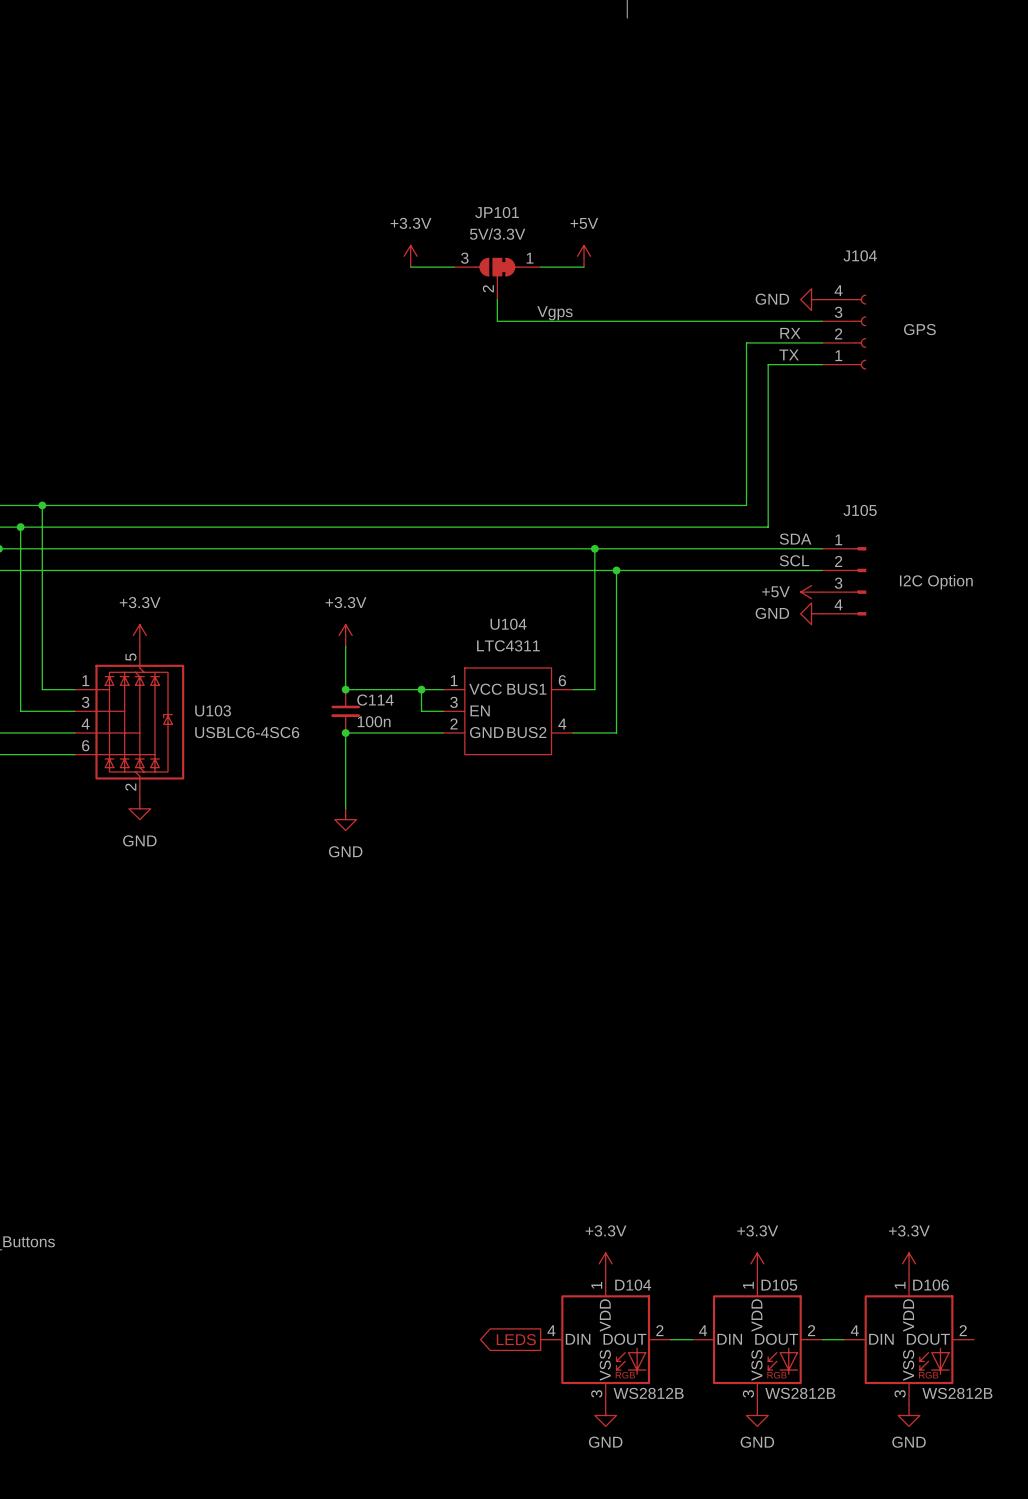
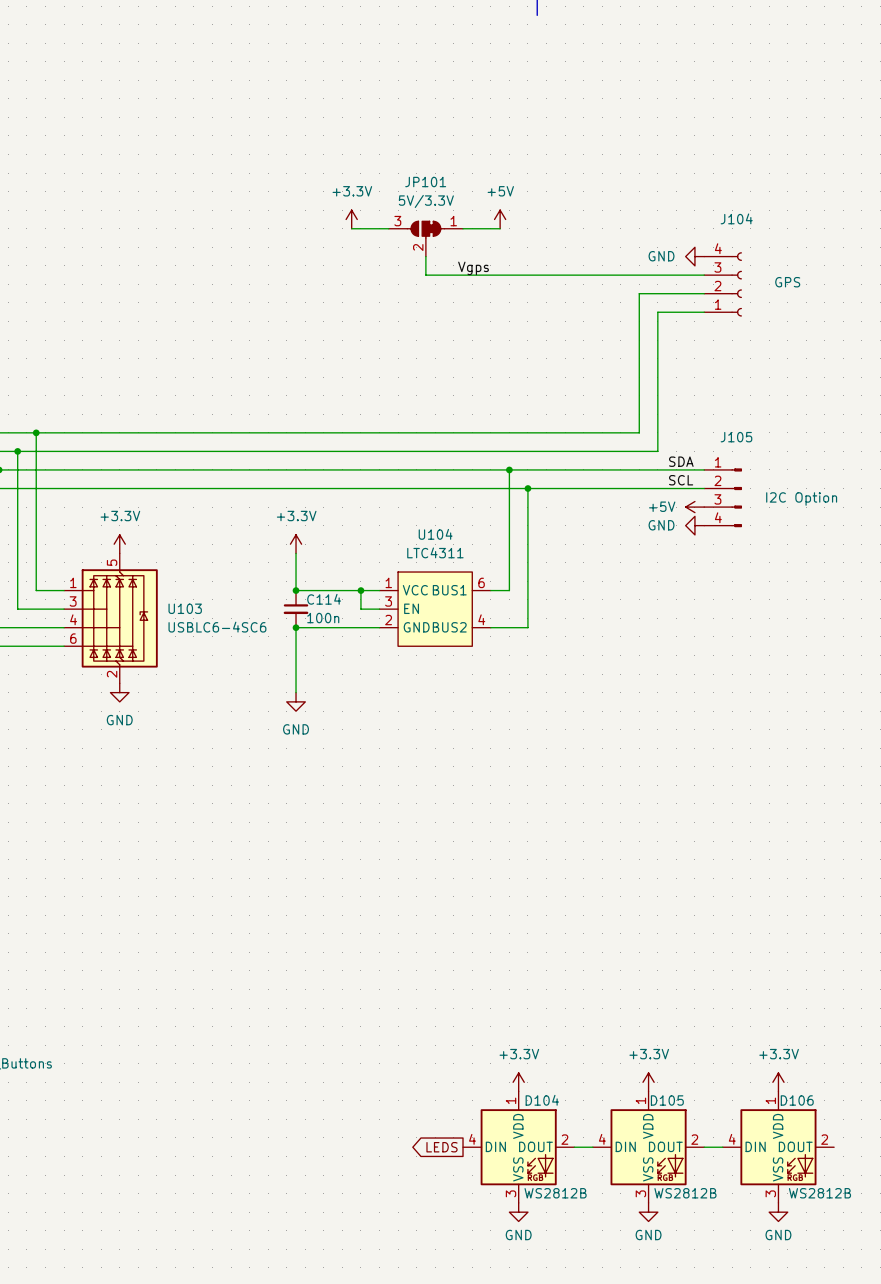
label: RX (790, 333) -> none
label: TX (789, 354) -> none

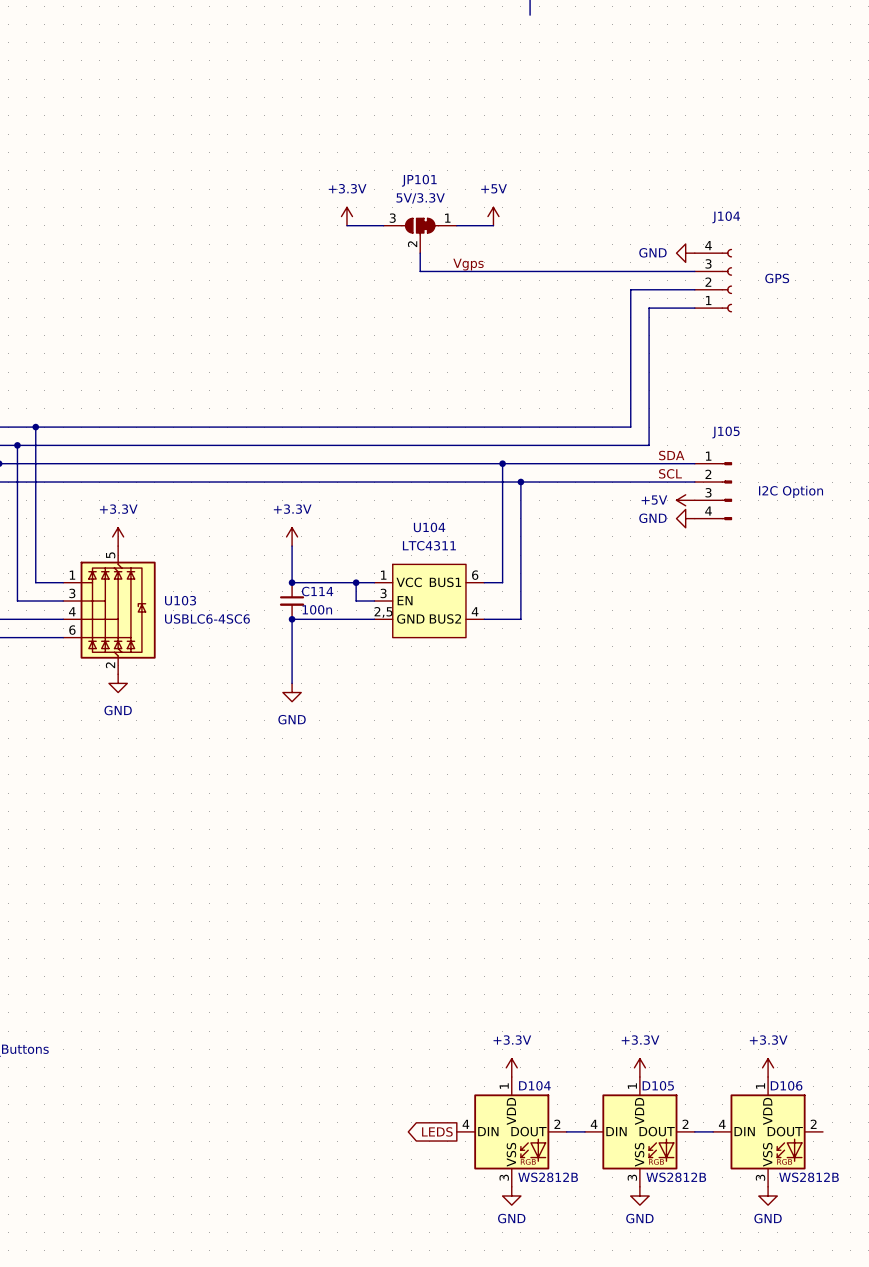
U104 pin number: 2 (388, 620) -> 2,5 (383, 612)

